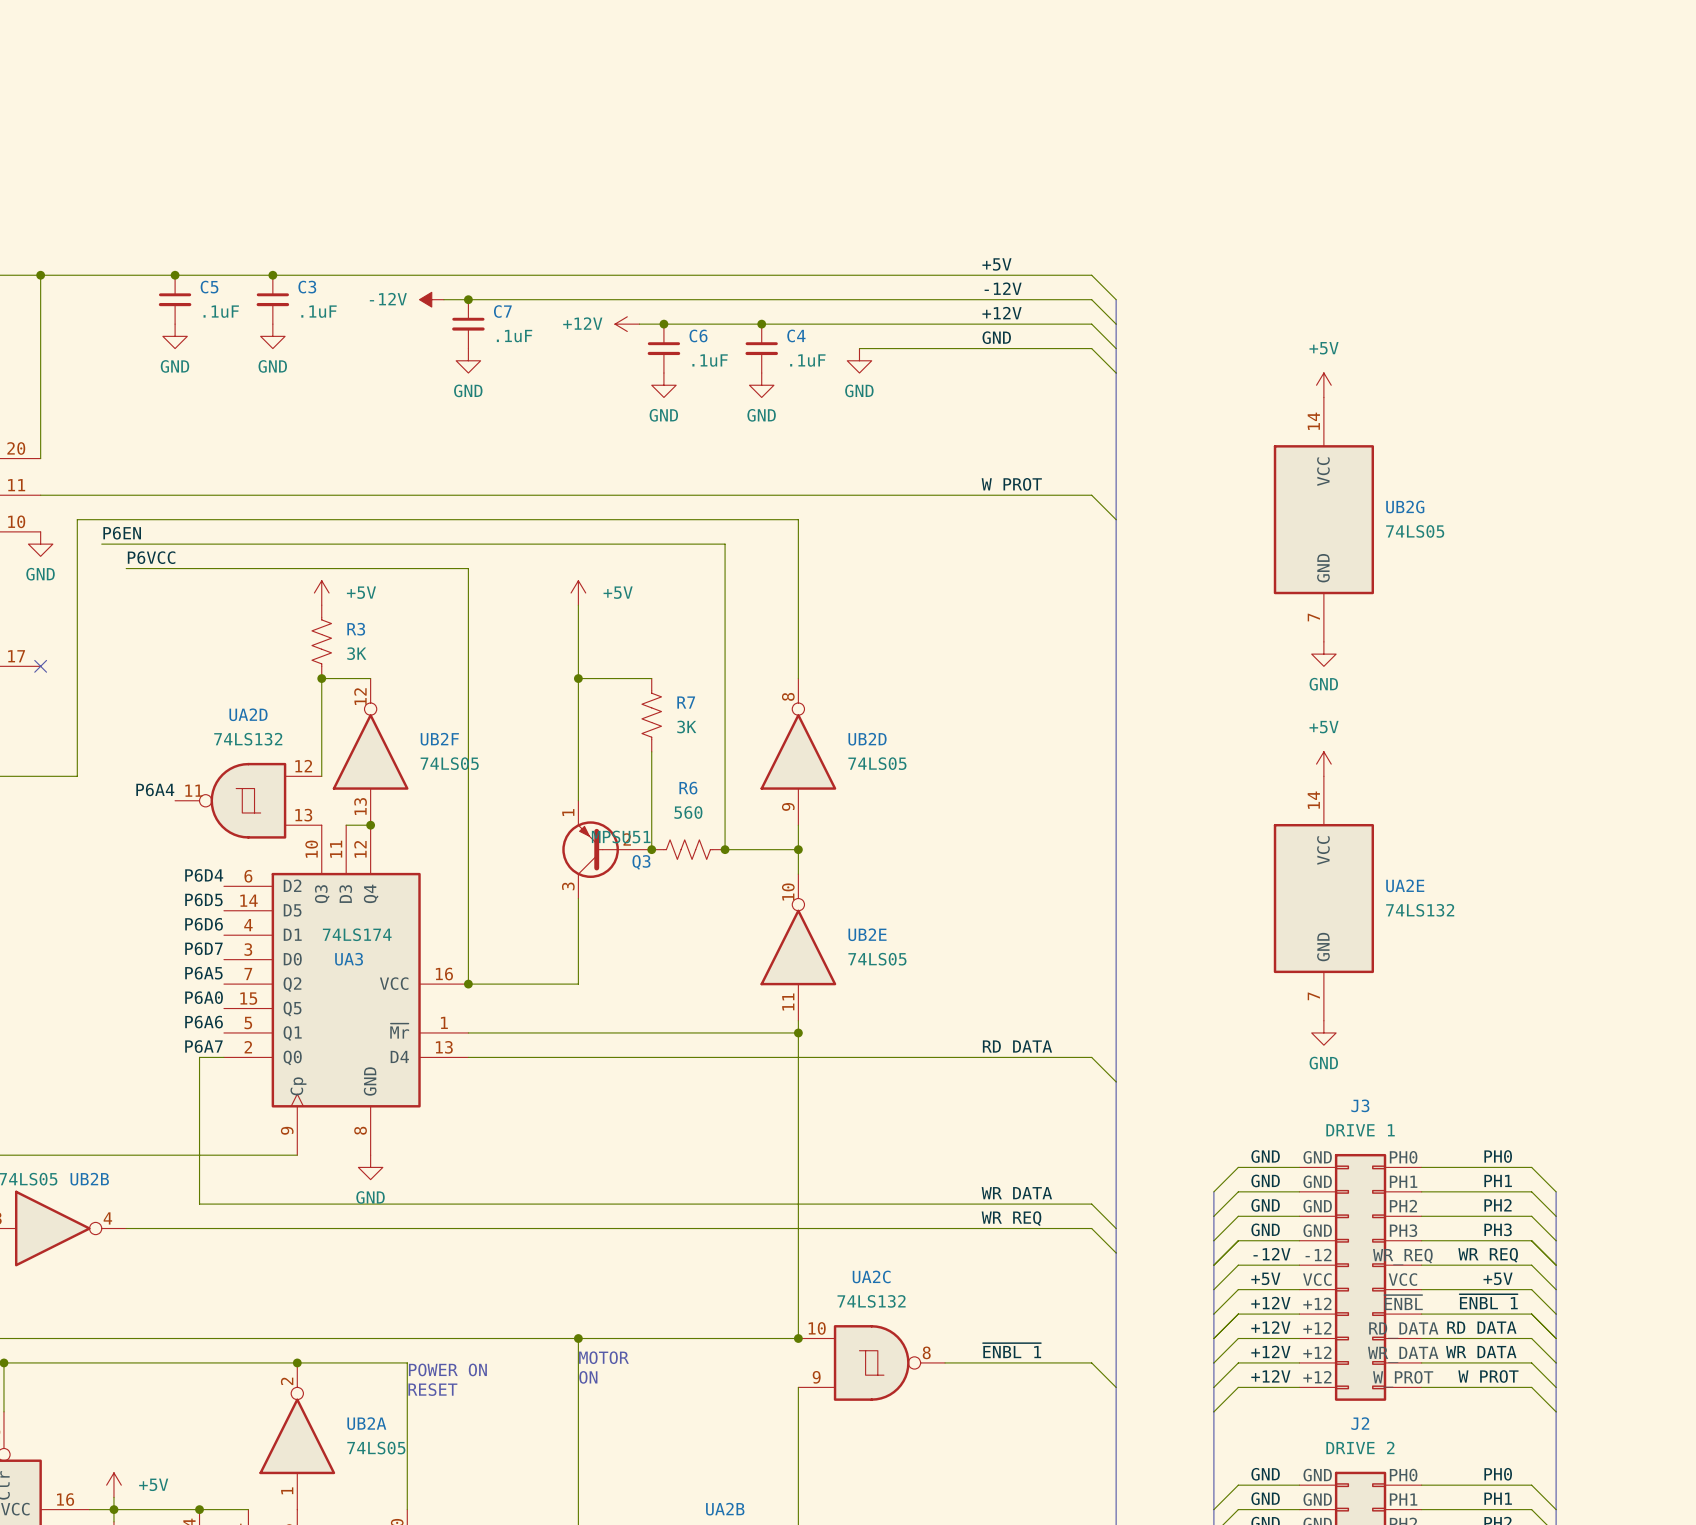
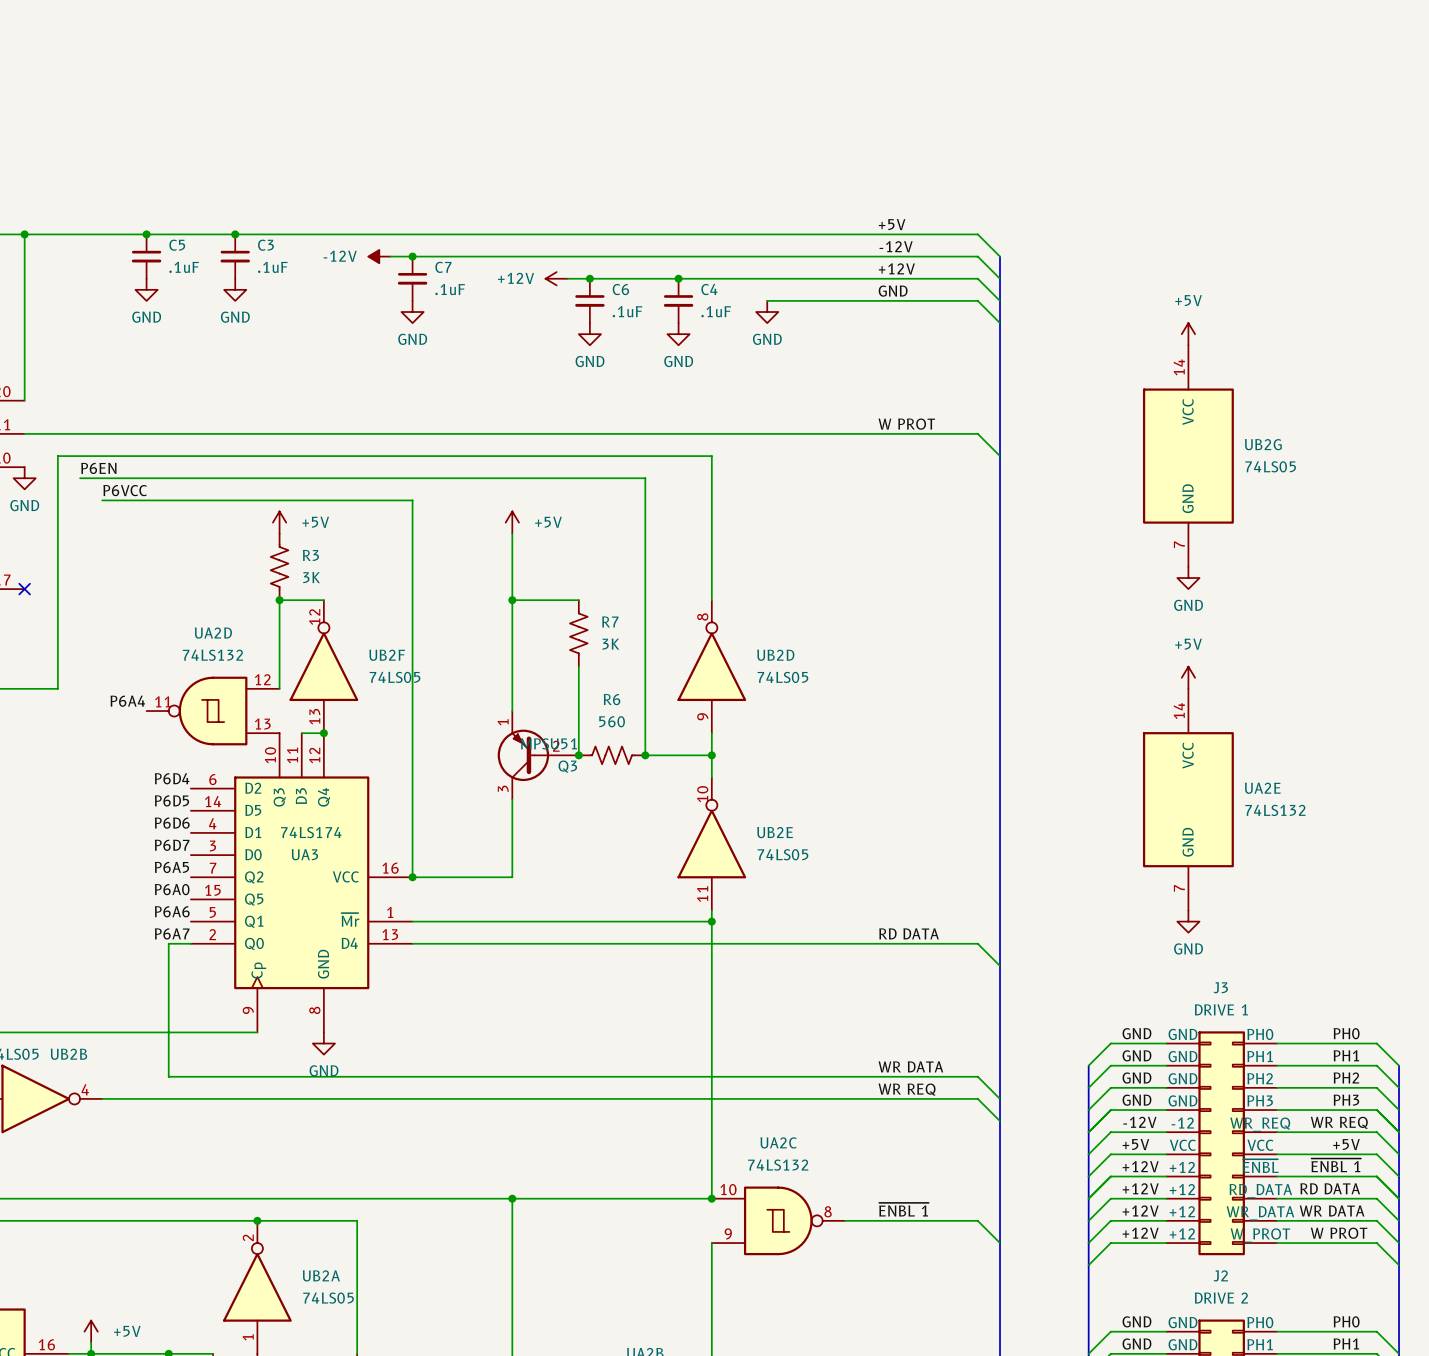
text: MOTOR (603, 1357) -> none
text: POWER ON (447, 1369) -> none
text: ON (588, 1377) -> none
text: RESET (432, 1389) -> none

